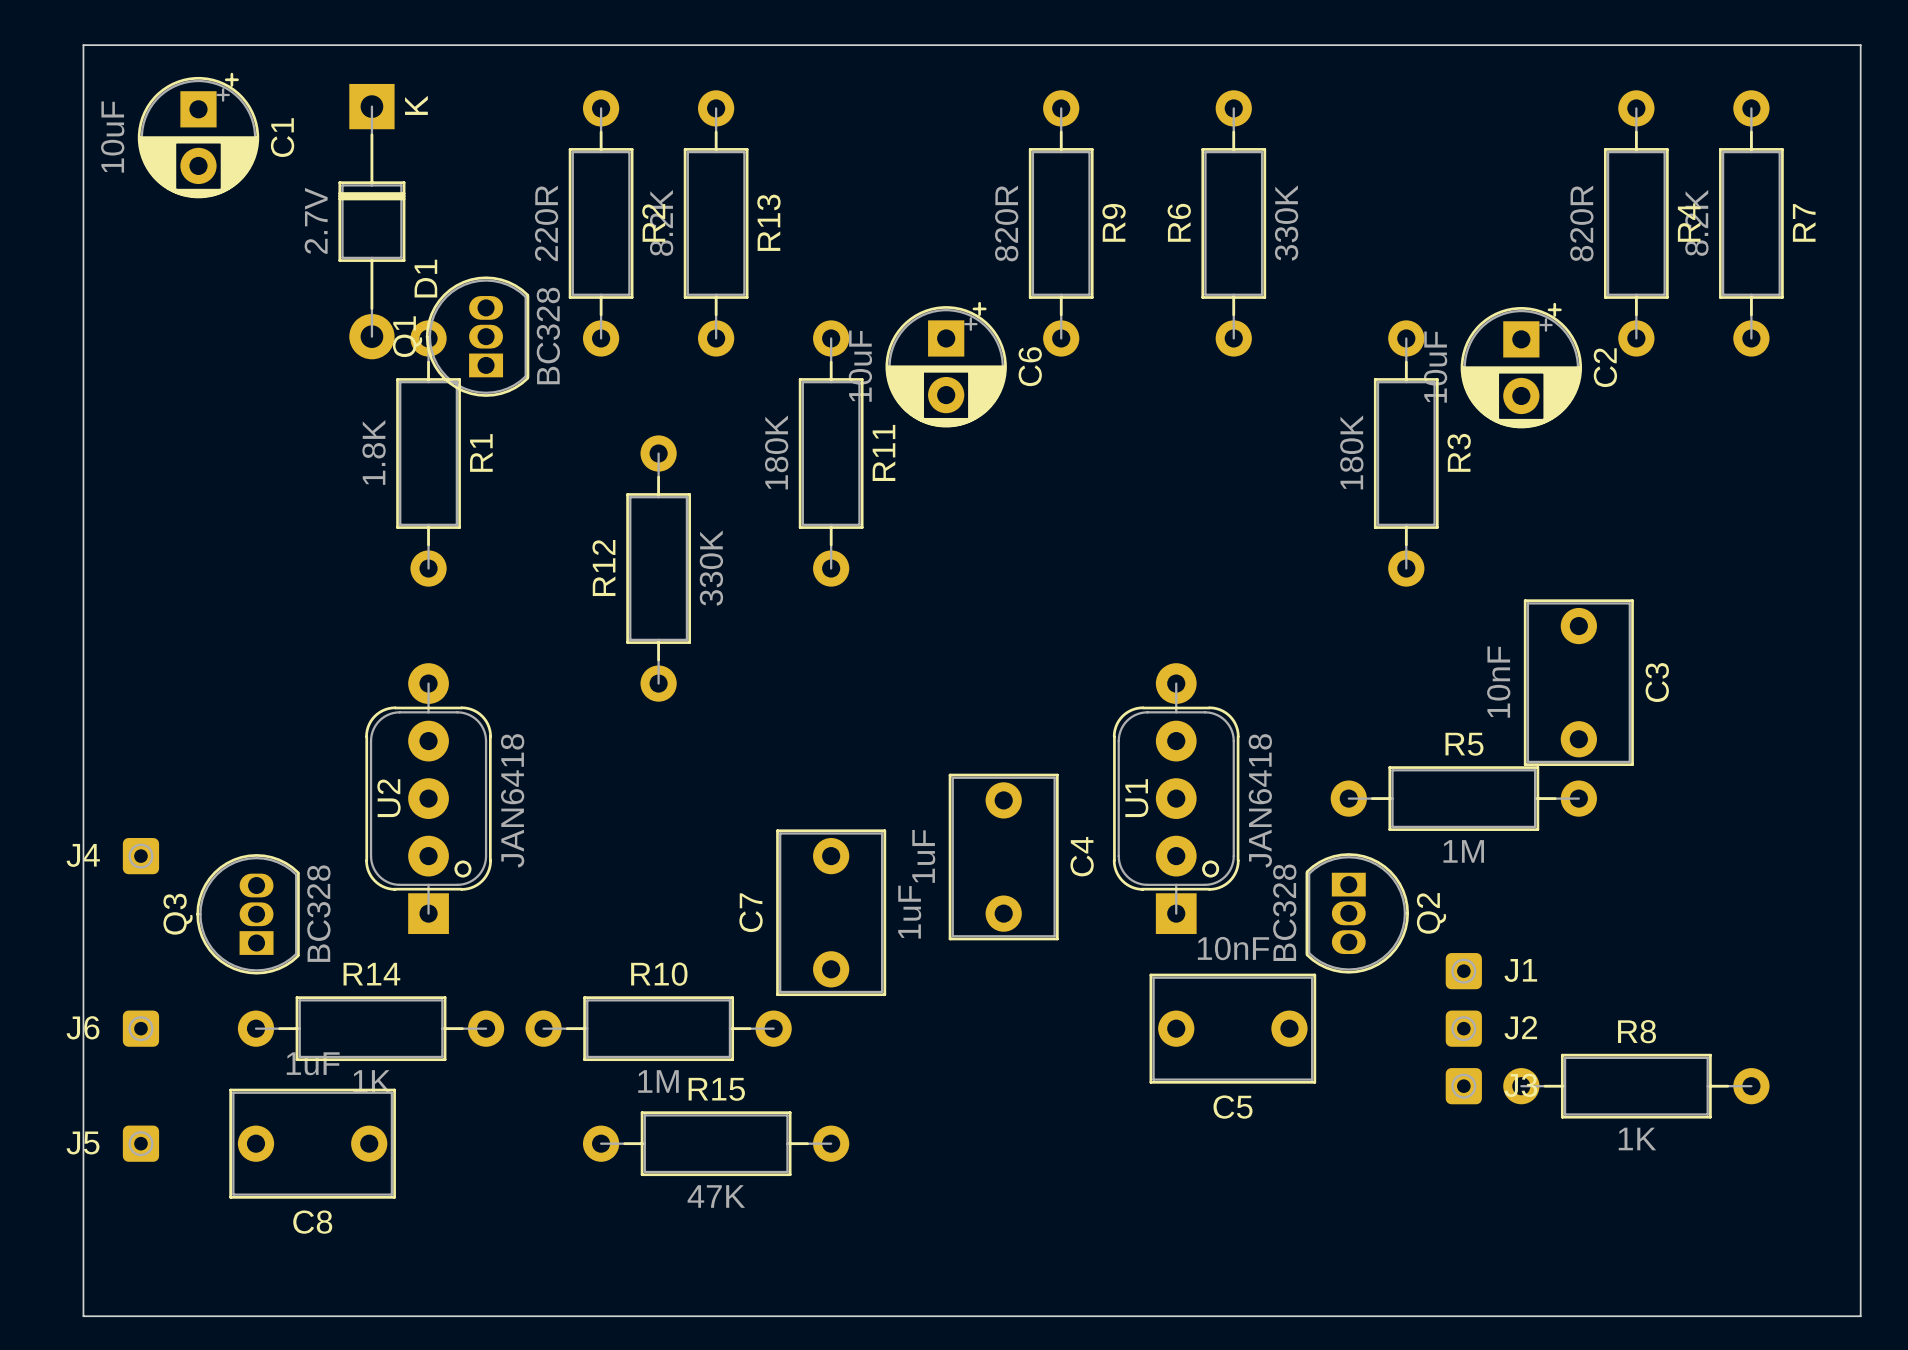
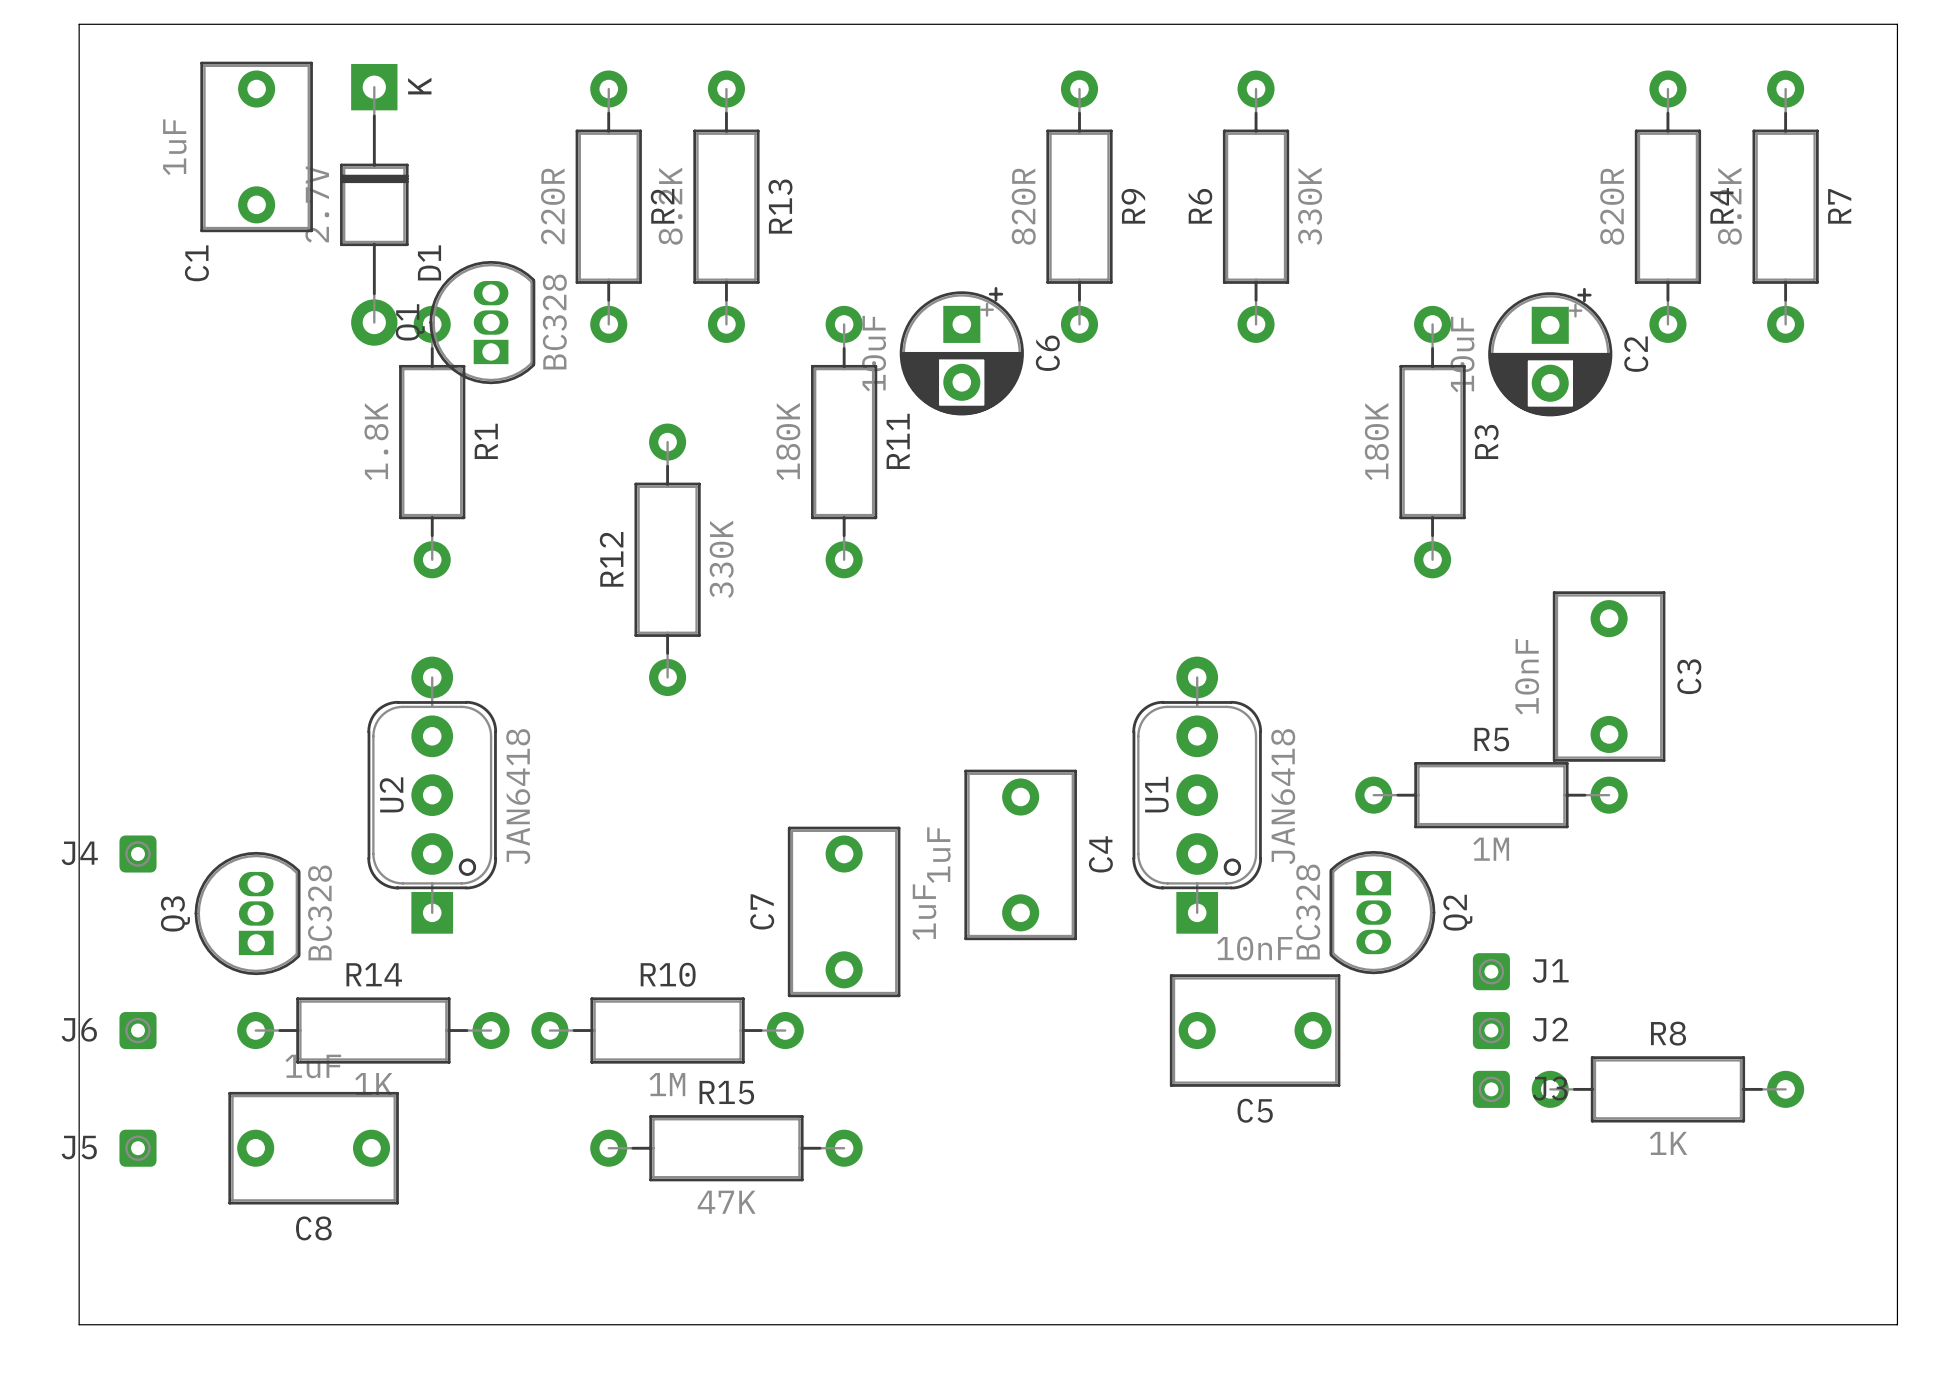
C1 footprint: [137, 72, 260, 199] -> [200, 61, 313, 233]
C1 value: 10uF (112, 137) -> 1uF (174, 147)
C1 name position: C1 (282, 137) -> C1 (196, 263)

